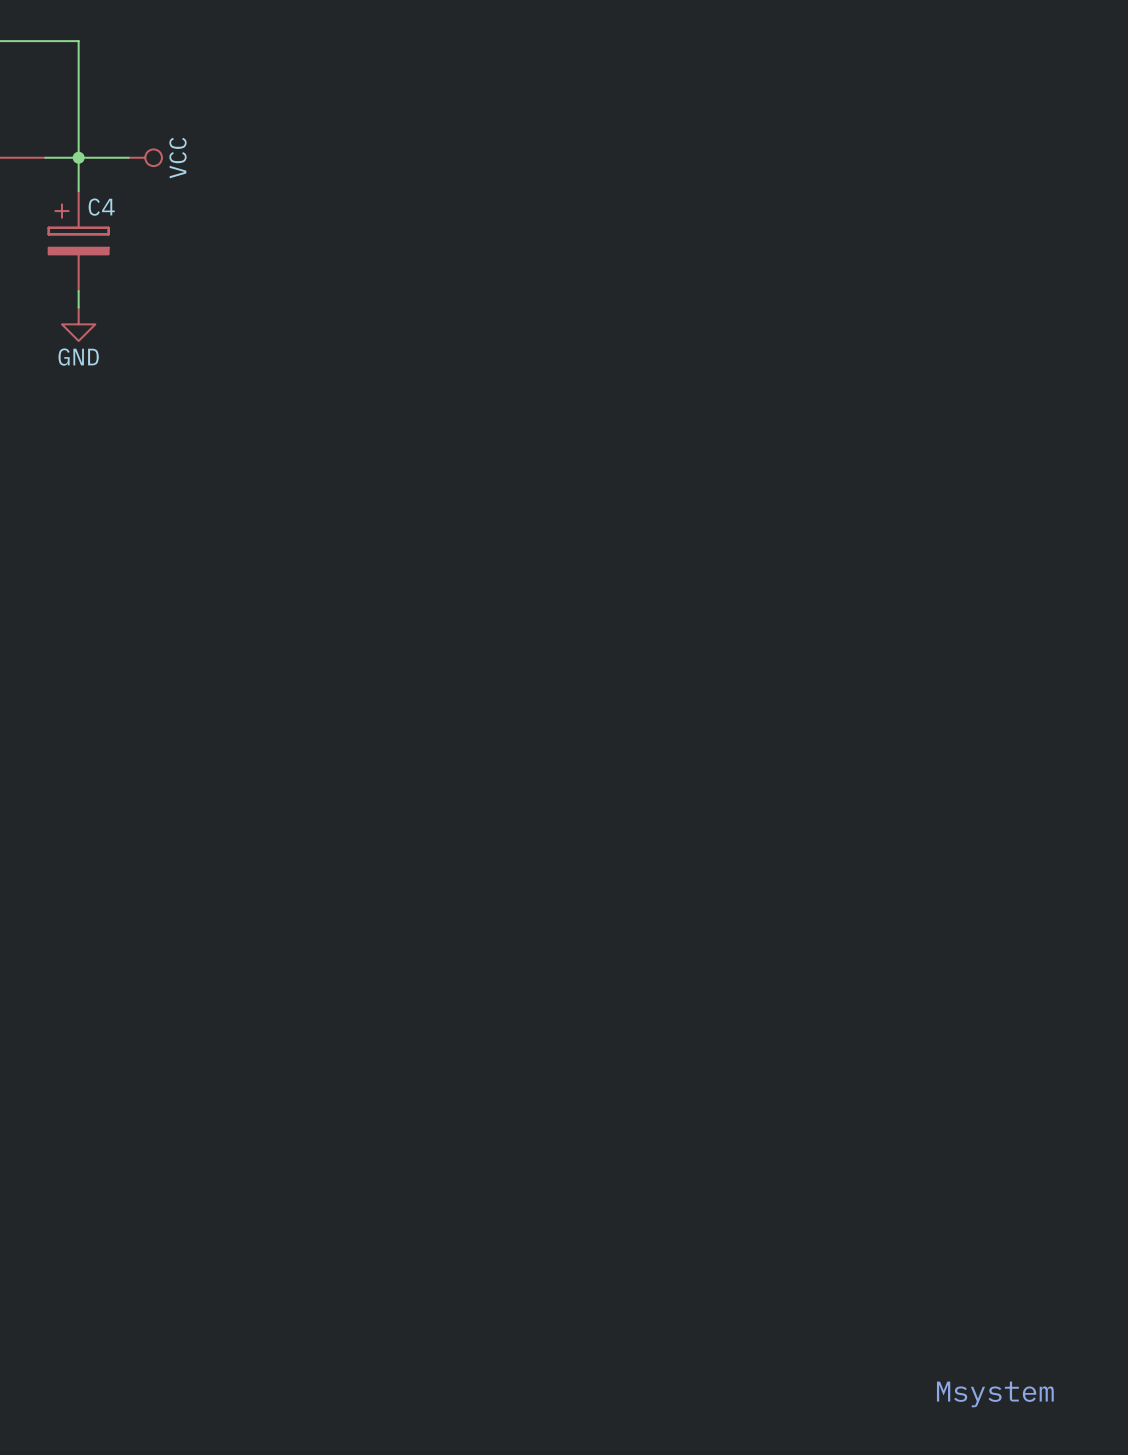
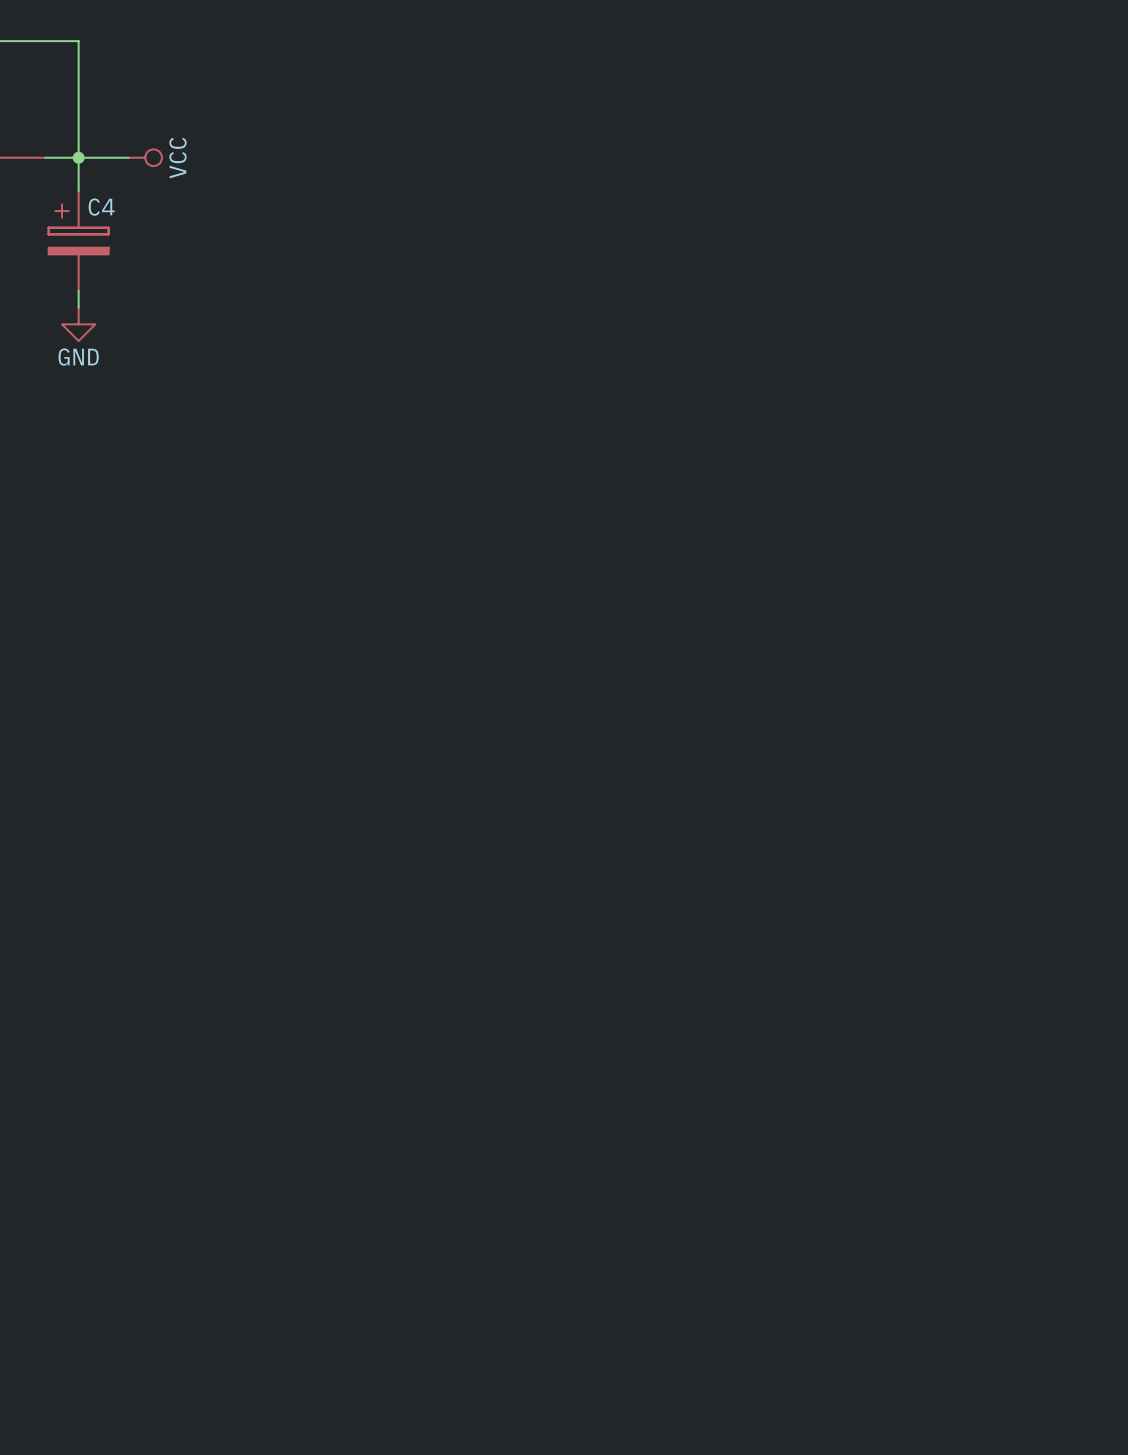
text: Msystem (995, 1394) -> none

